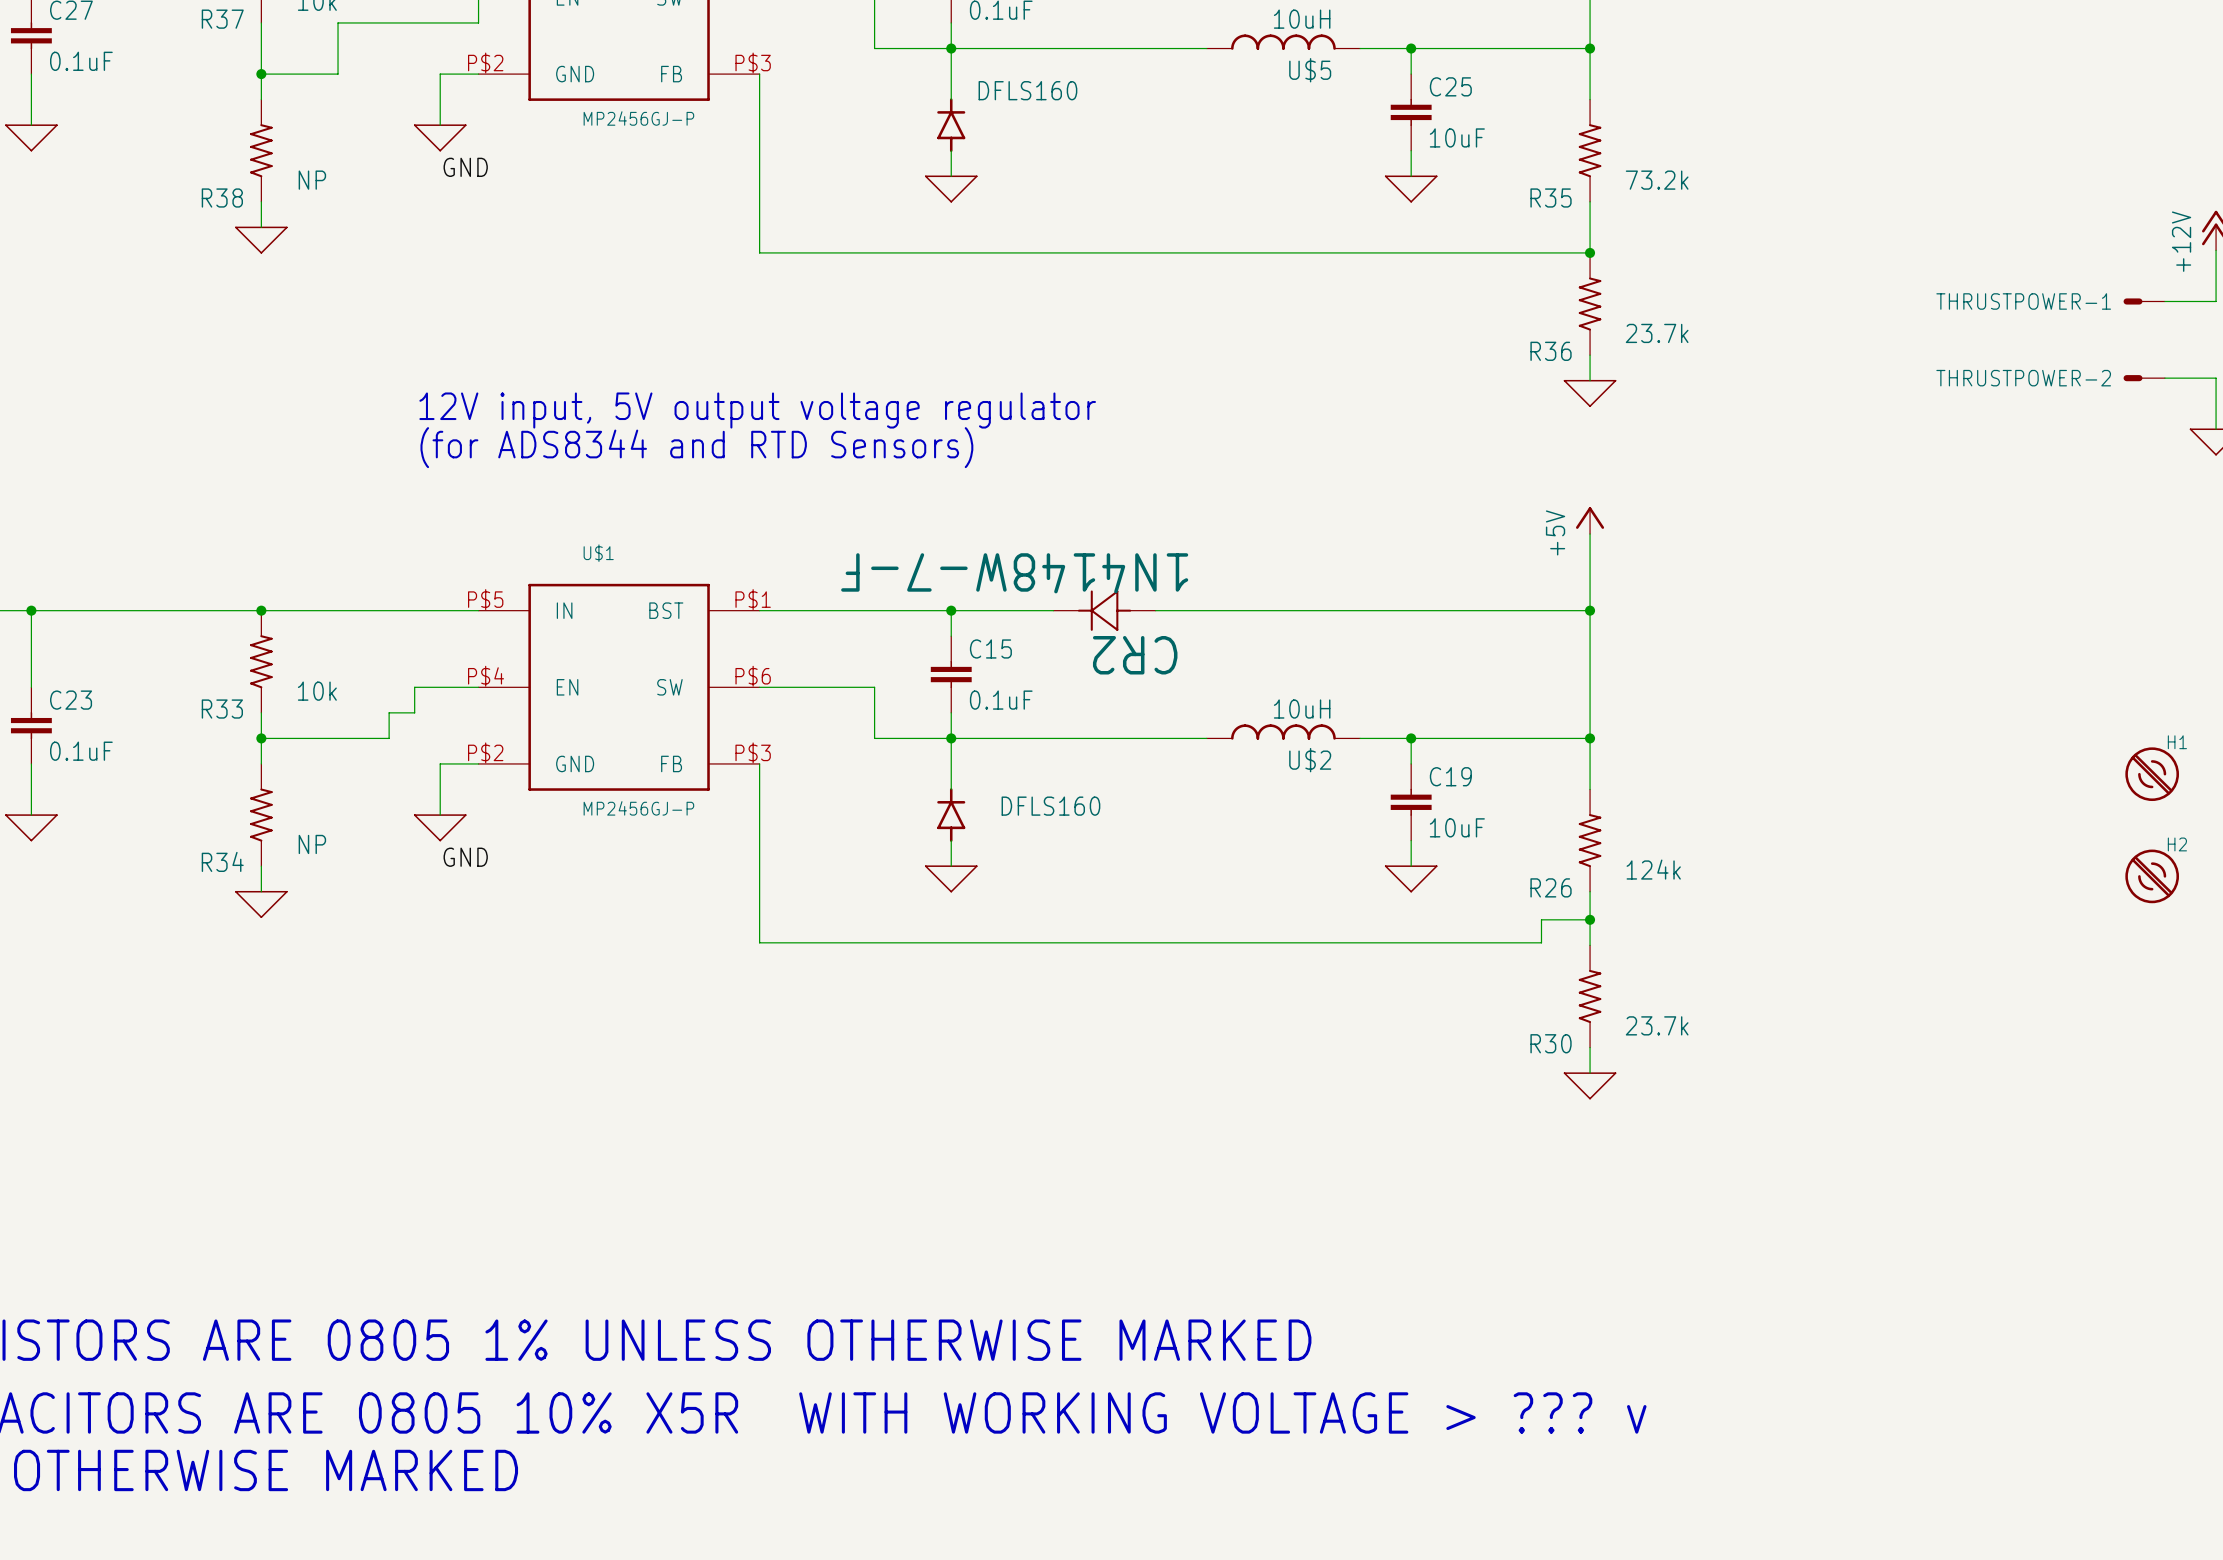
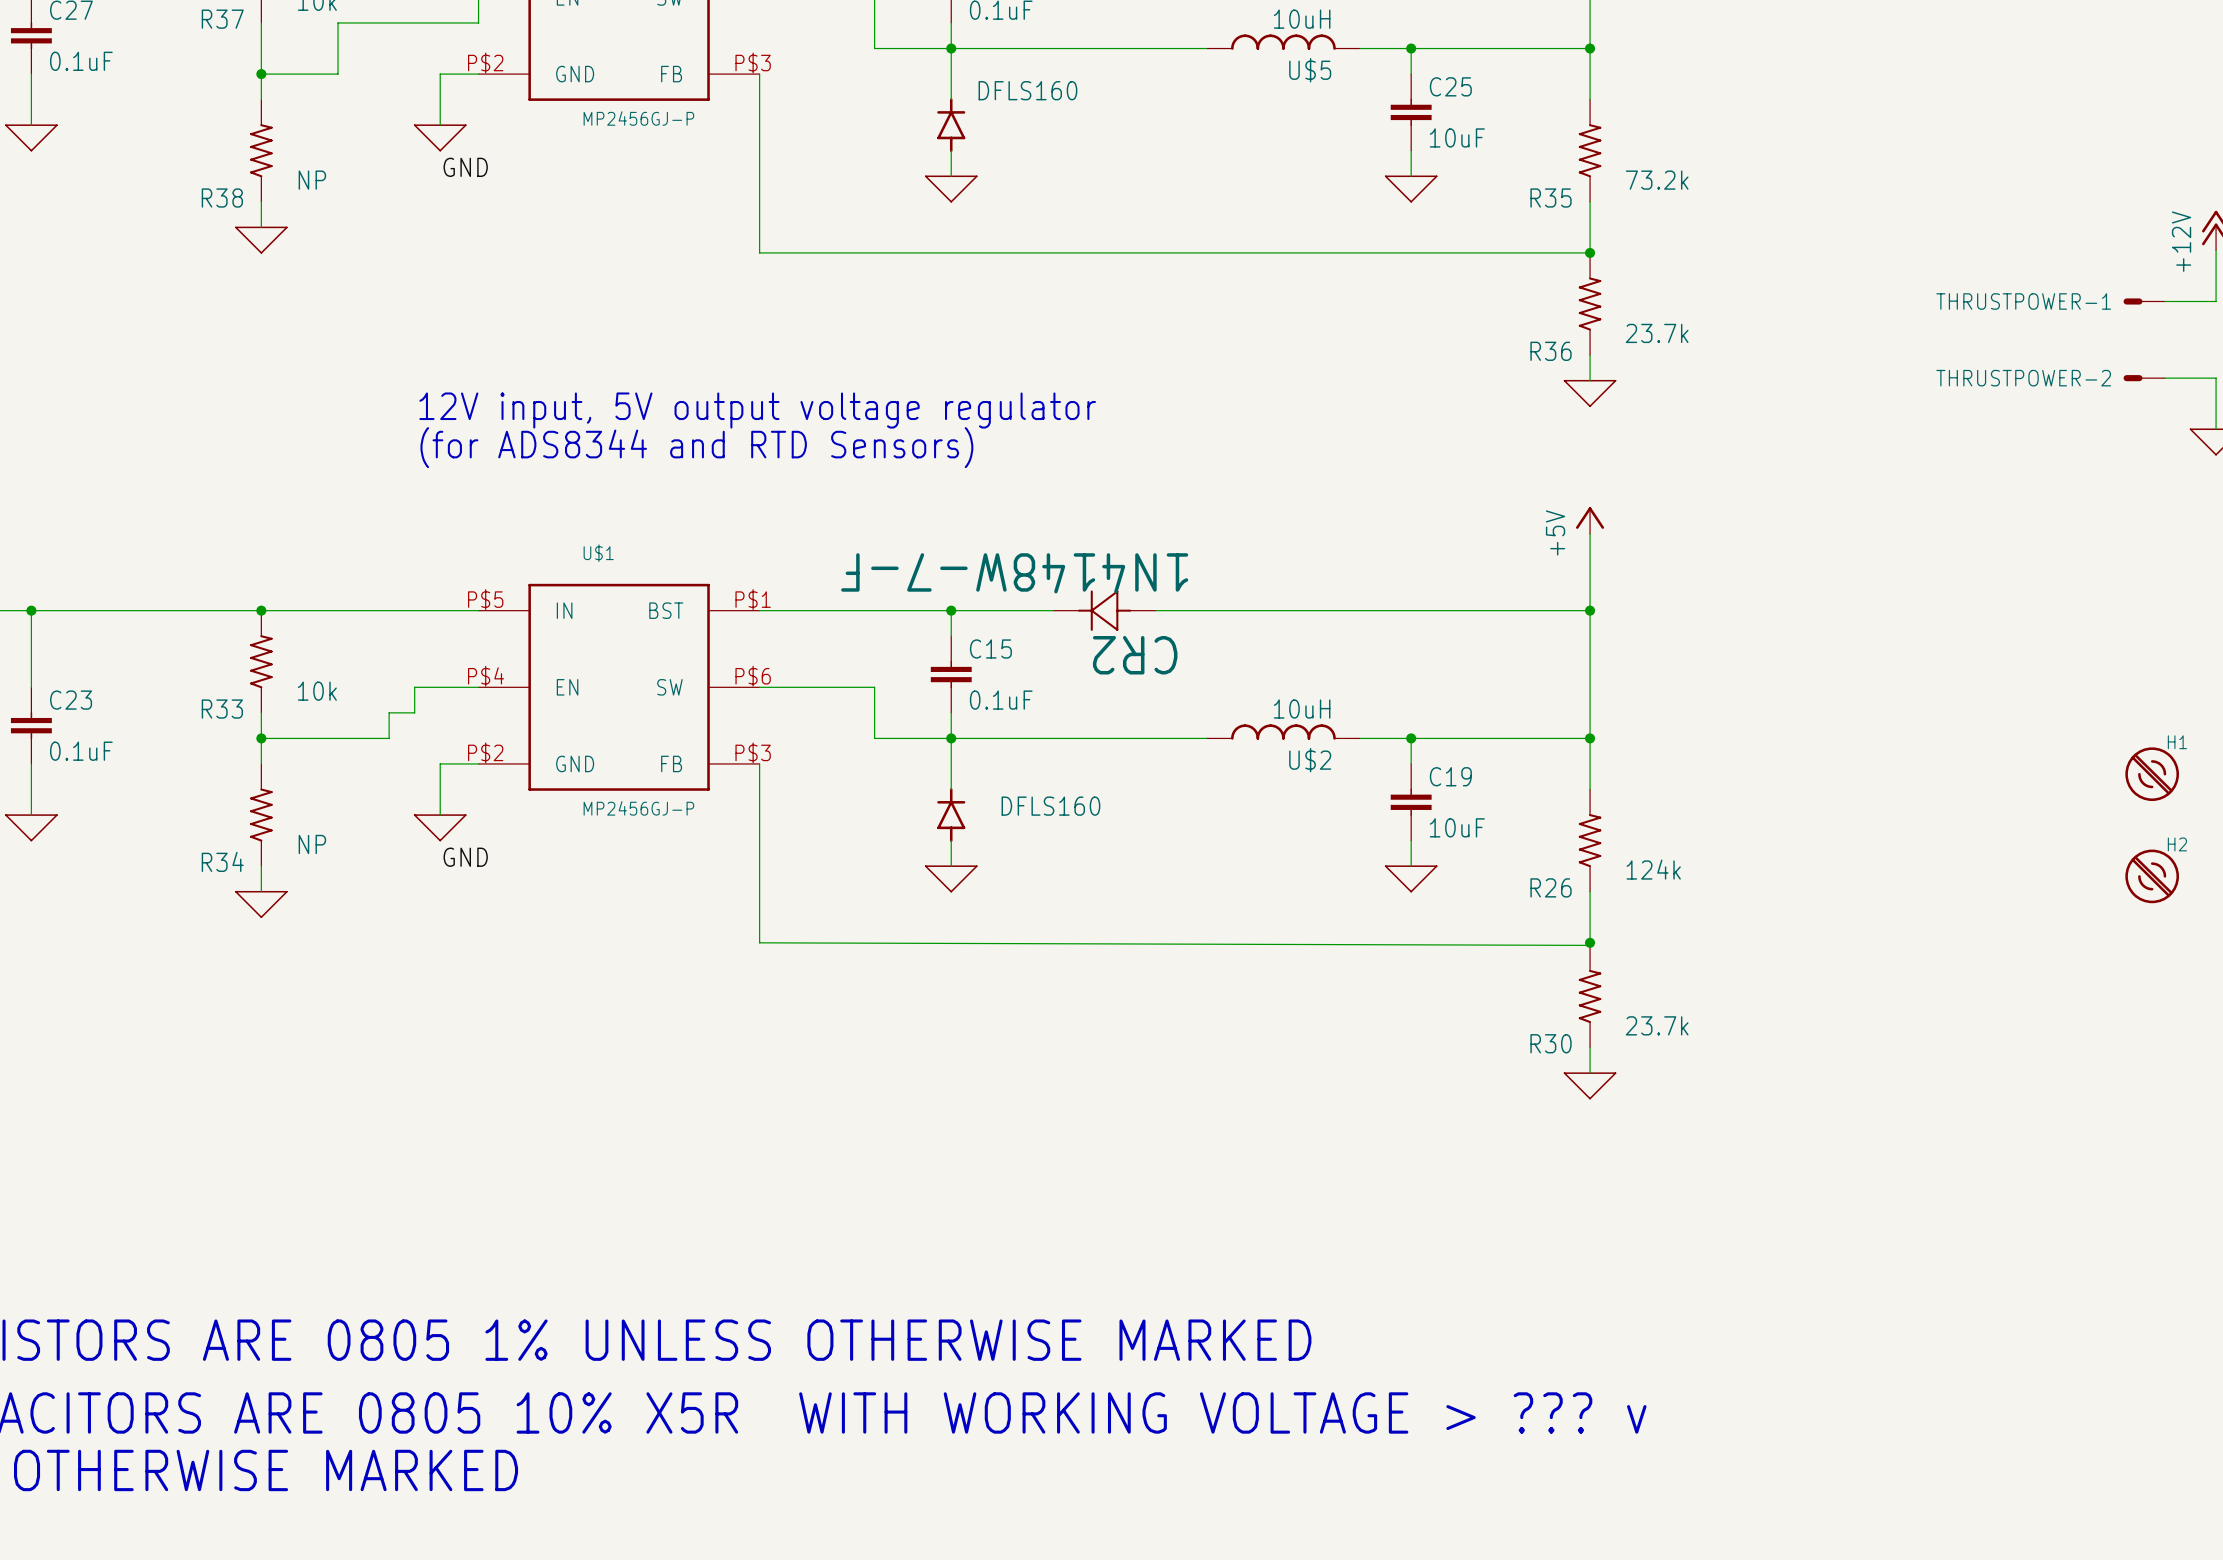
wire: (1590, 919) (1541, 919) (1541, 942) (759, 942) -> (1590, 945) (759, 942)
junction position: (1590, 919) -> (1590, 942)

